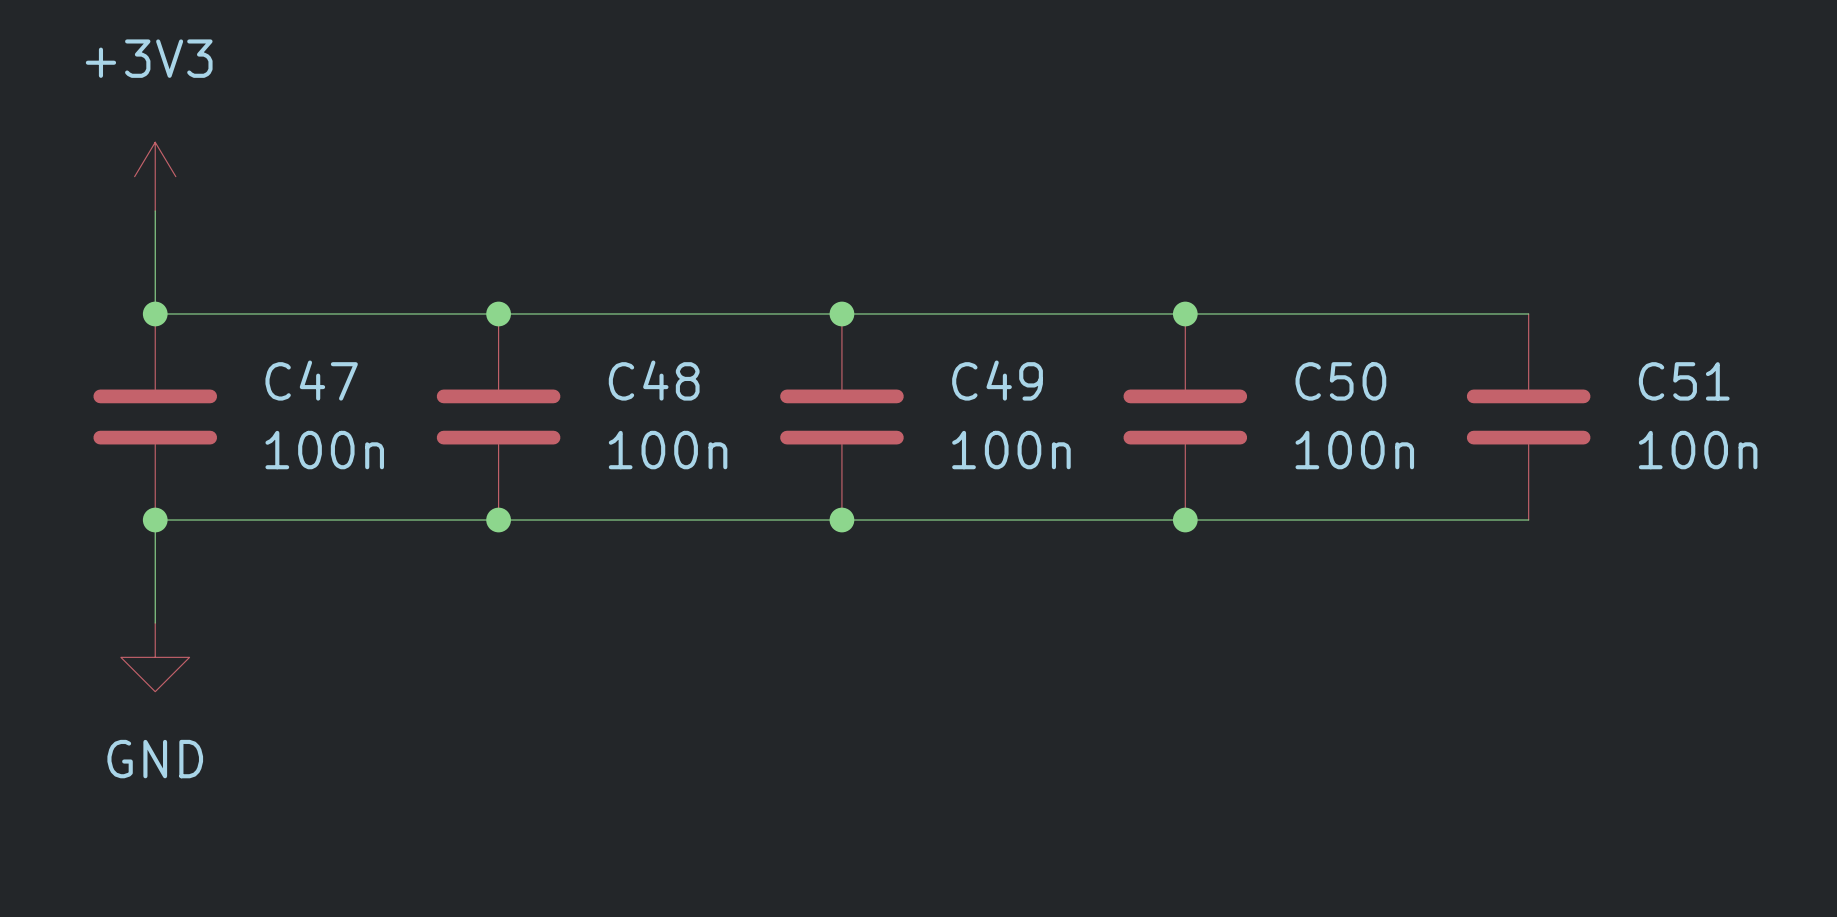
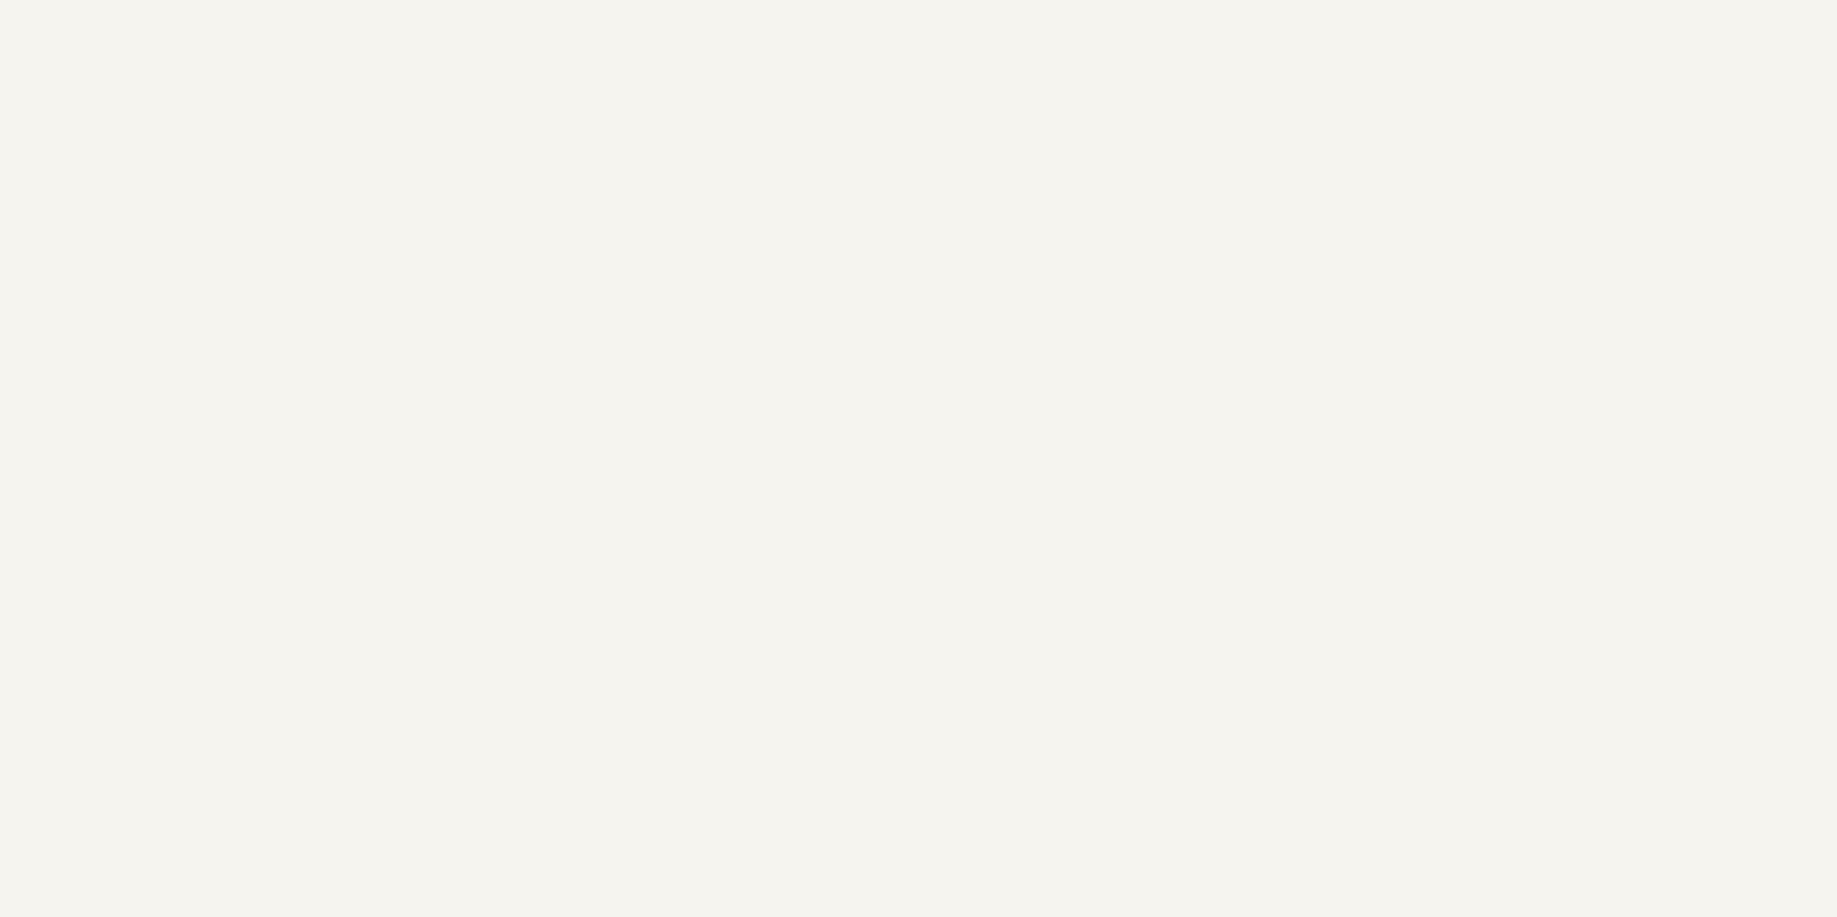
power symbol: +3V3 (155, 176) -> none
wire: (155, 210) (155, 314) (1528, 314) -> none
junction: (155, 314) -> none
junction: (498, 314) -> none
junction: (841, 314) -> none
junction: (1185, 314) -> none
C47: 100n (155, 417) -> none
C48: 100n (498, 417) -> none
C49: 100n (841, 417) -> none
C50: 100n (1185, 417) -> none
C51: 100n (1528, 417) -> none
junction: (155, 520) -> none
junction: (498, 520) -> none
junction: (841, 520) -> none
junction: (1185, 520) -> none
wire: (1528, 520) (155, 520) (155, 623) -> none
power symbol: GND (155, 657) -> none

